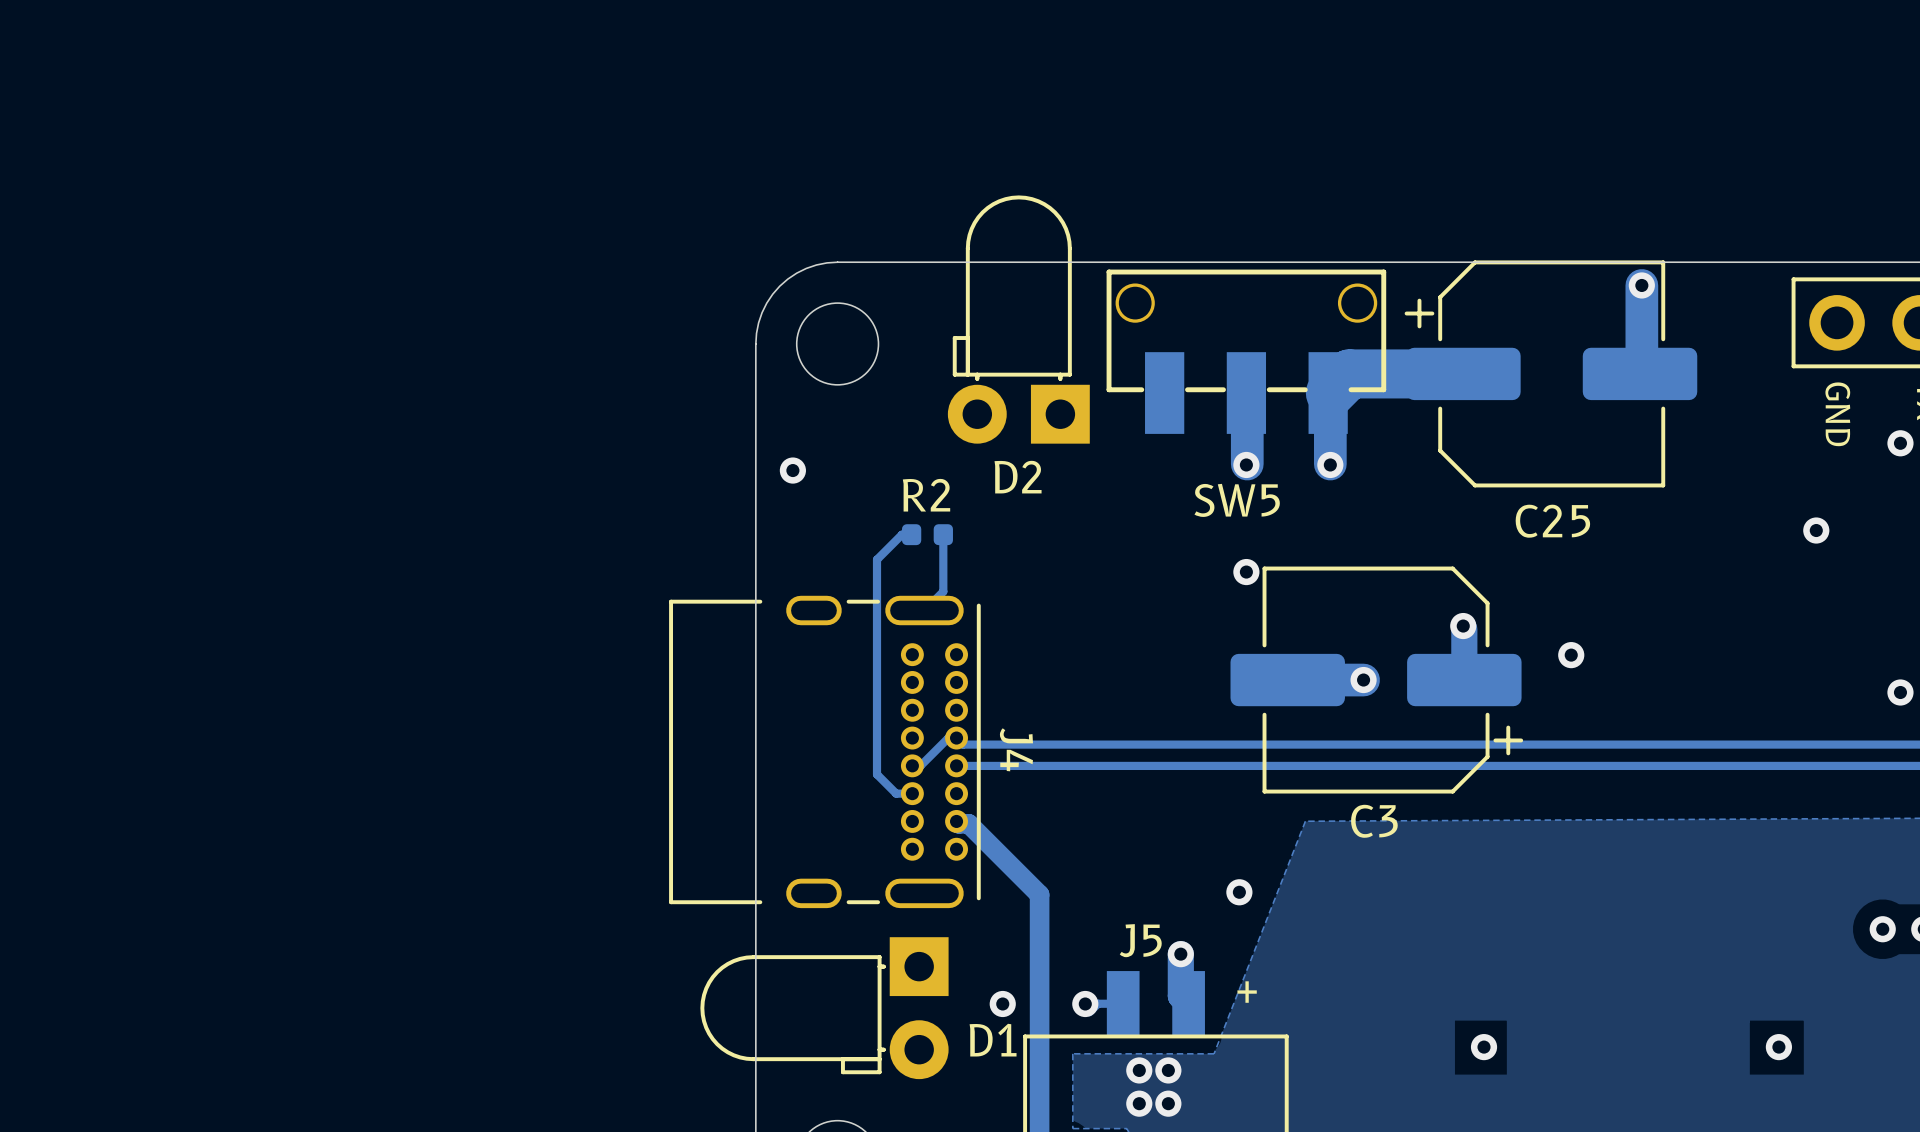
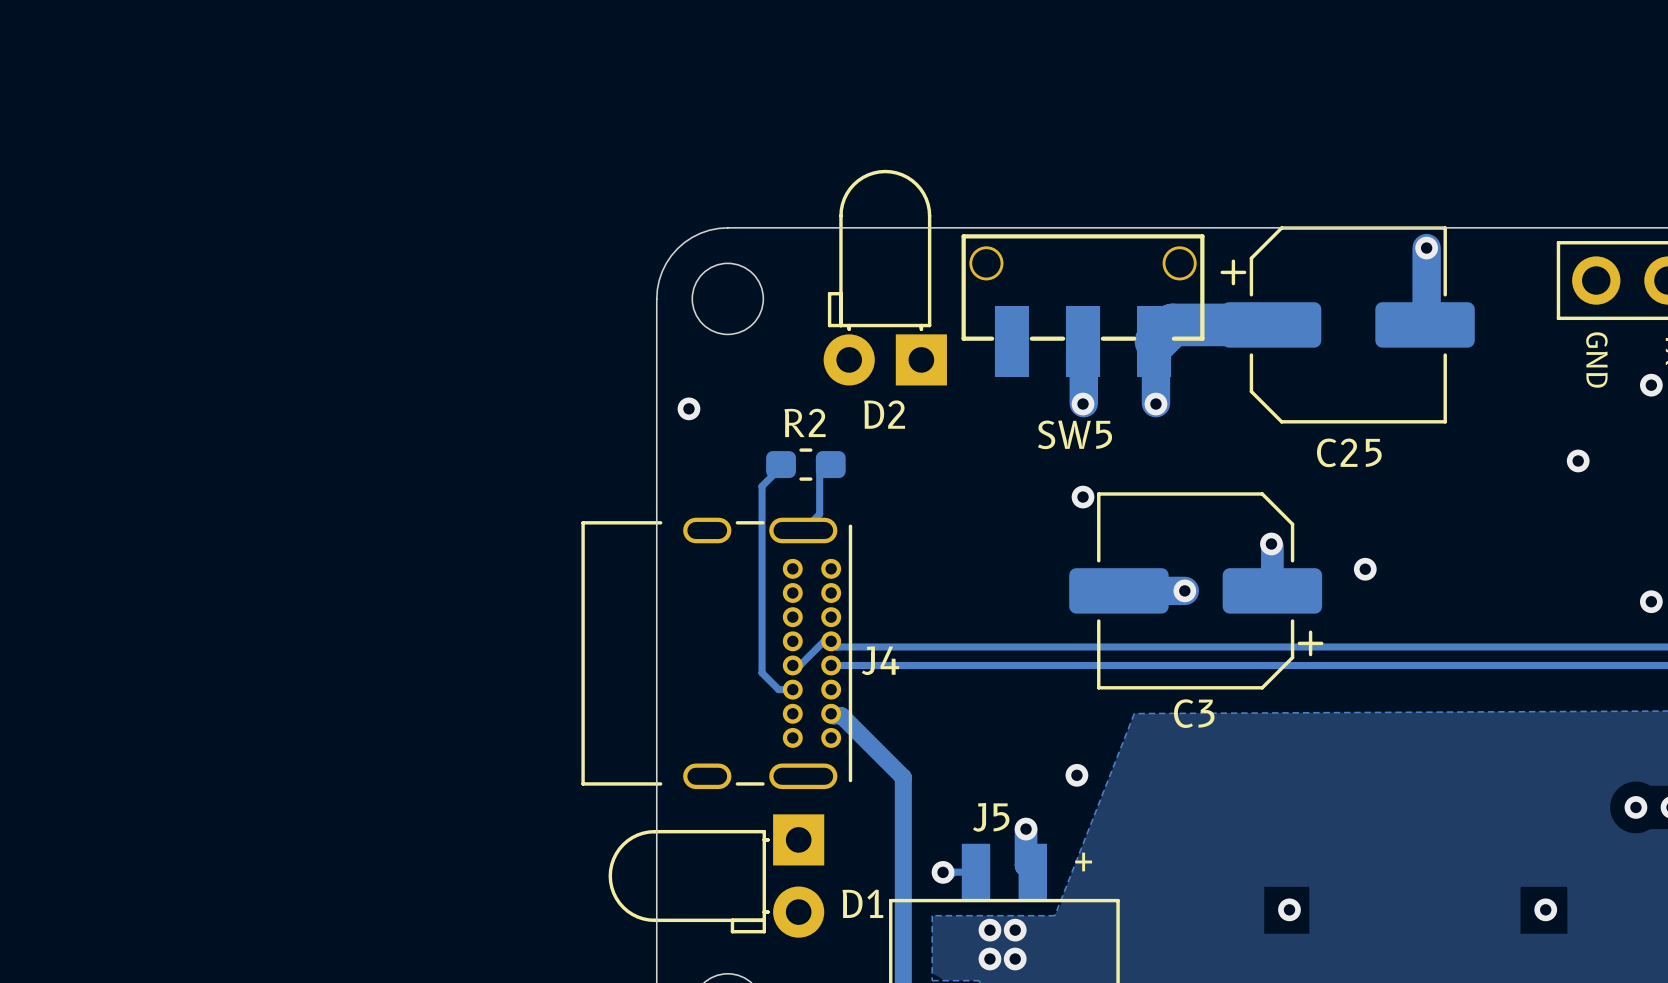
R2 footprint: [901, 524, 953, 546] -> [766, 448, 846, 481]
J4 name rotation: 0° (1016, 749) -> 90° counterclockwise (880, 660)
via: (1002, 1004) -> none

